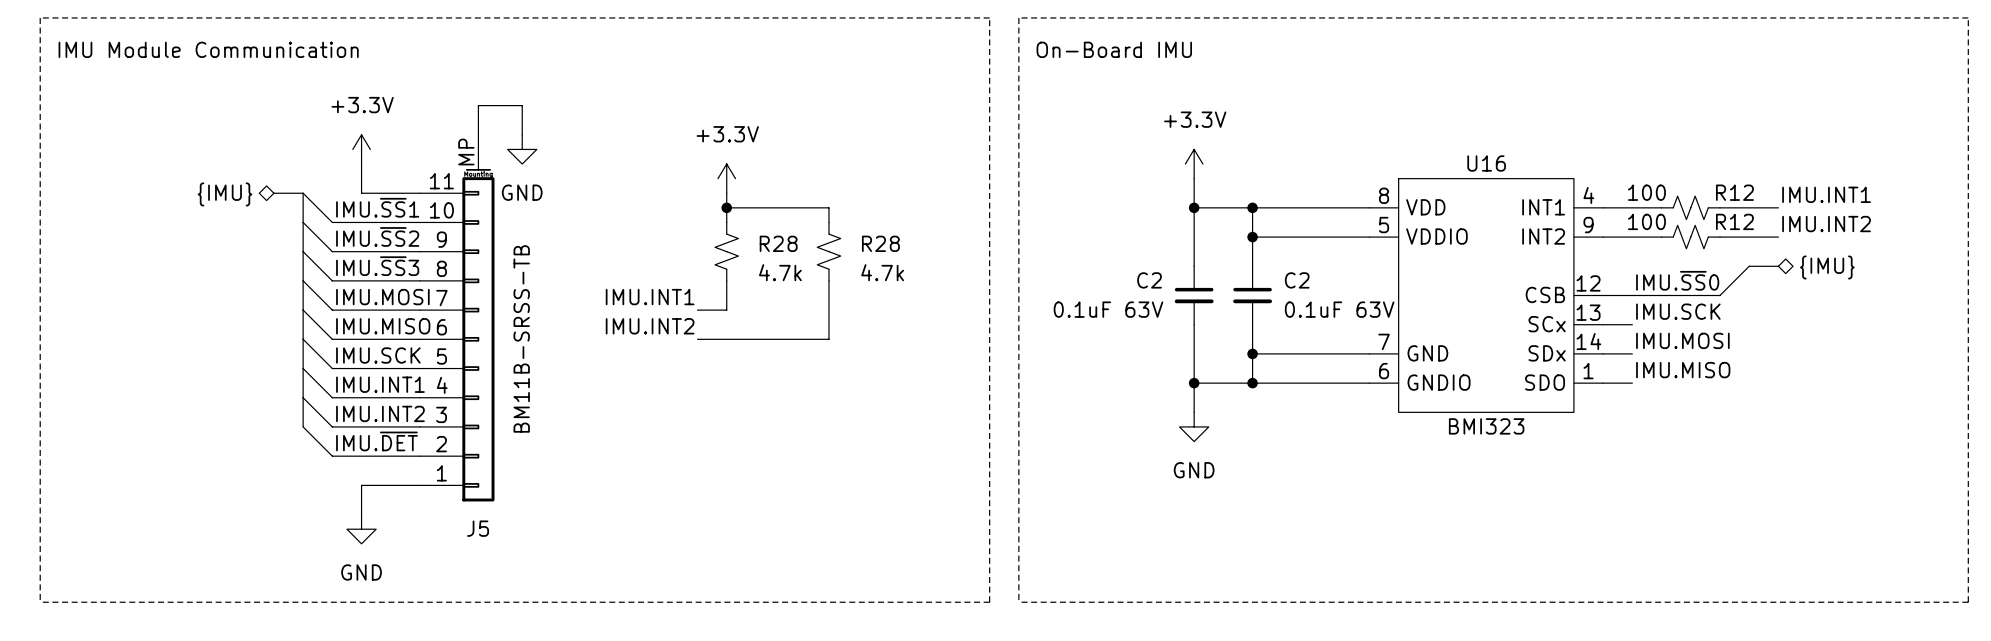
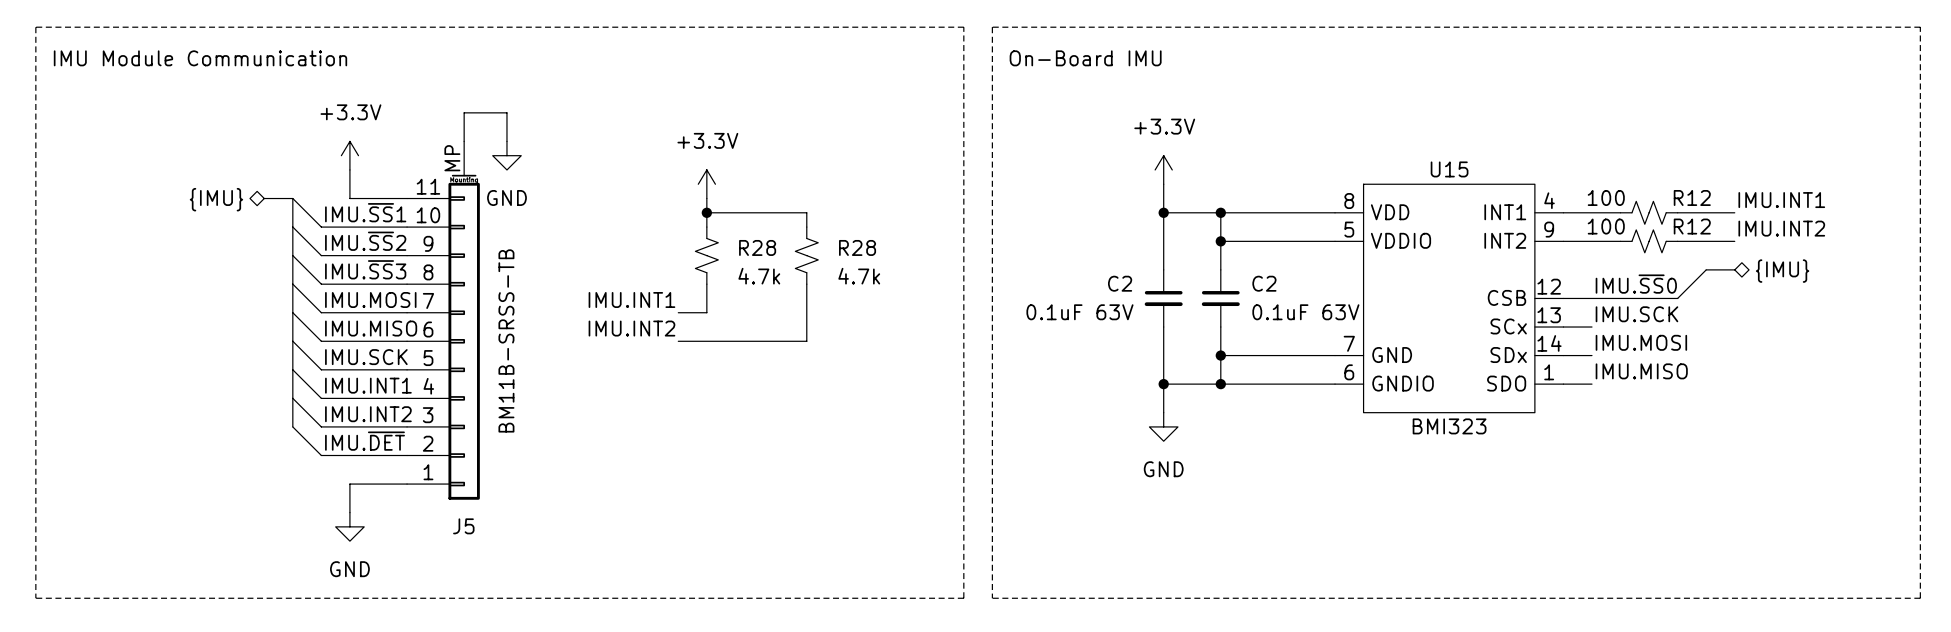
U16 name: U16 (1486, 163) -> U15 (1449, 169)

